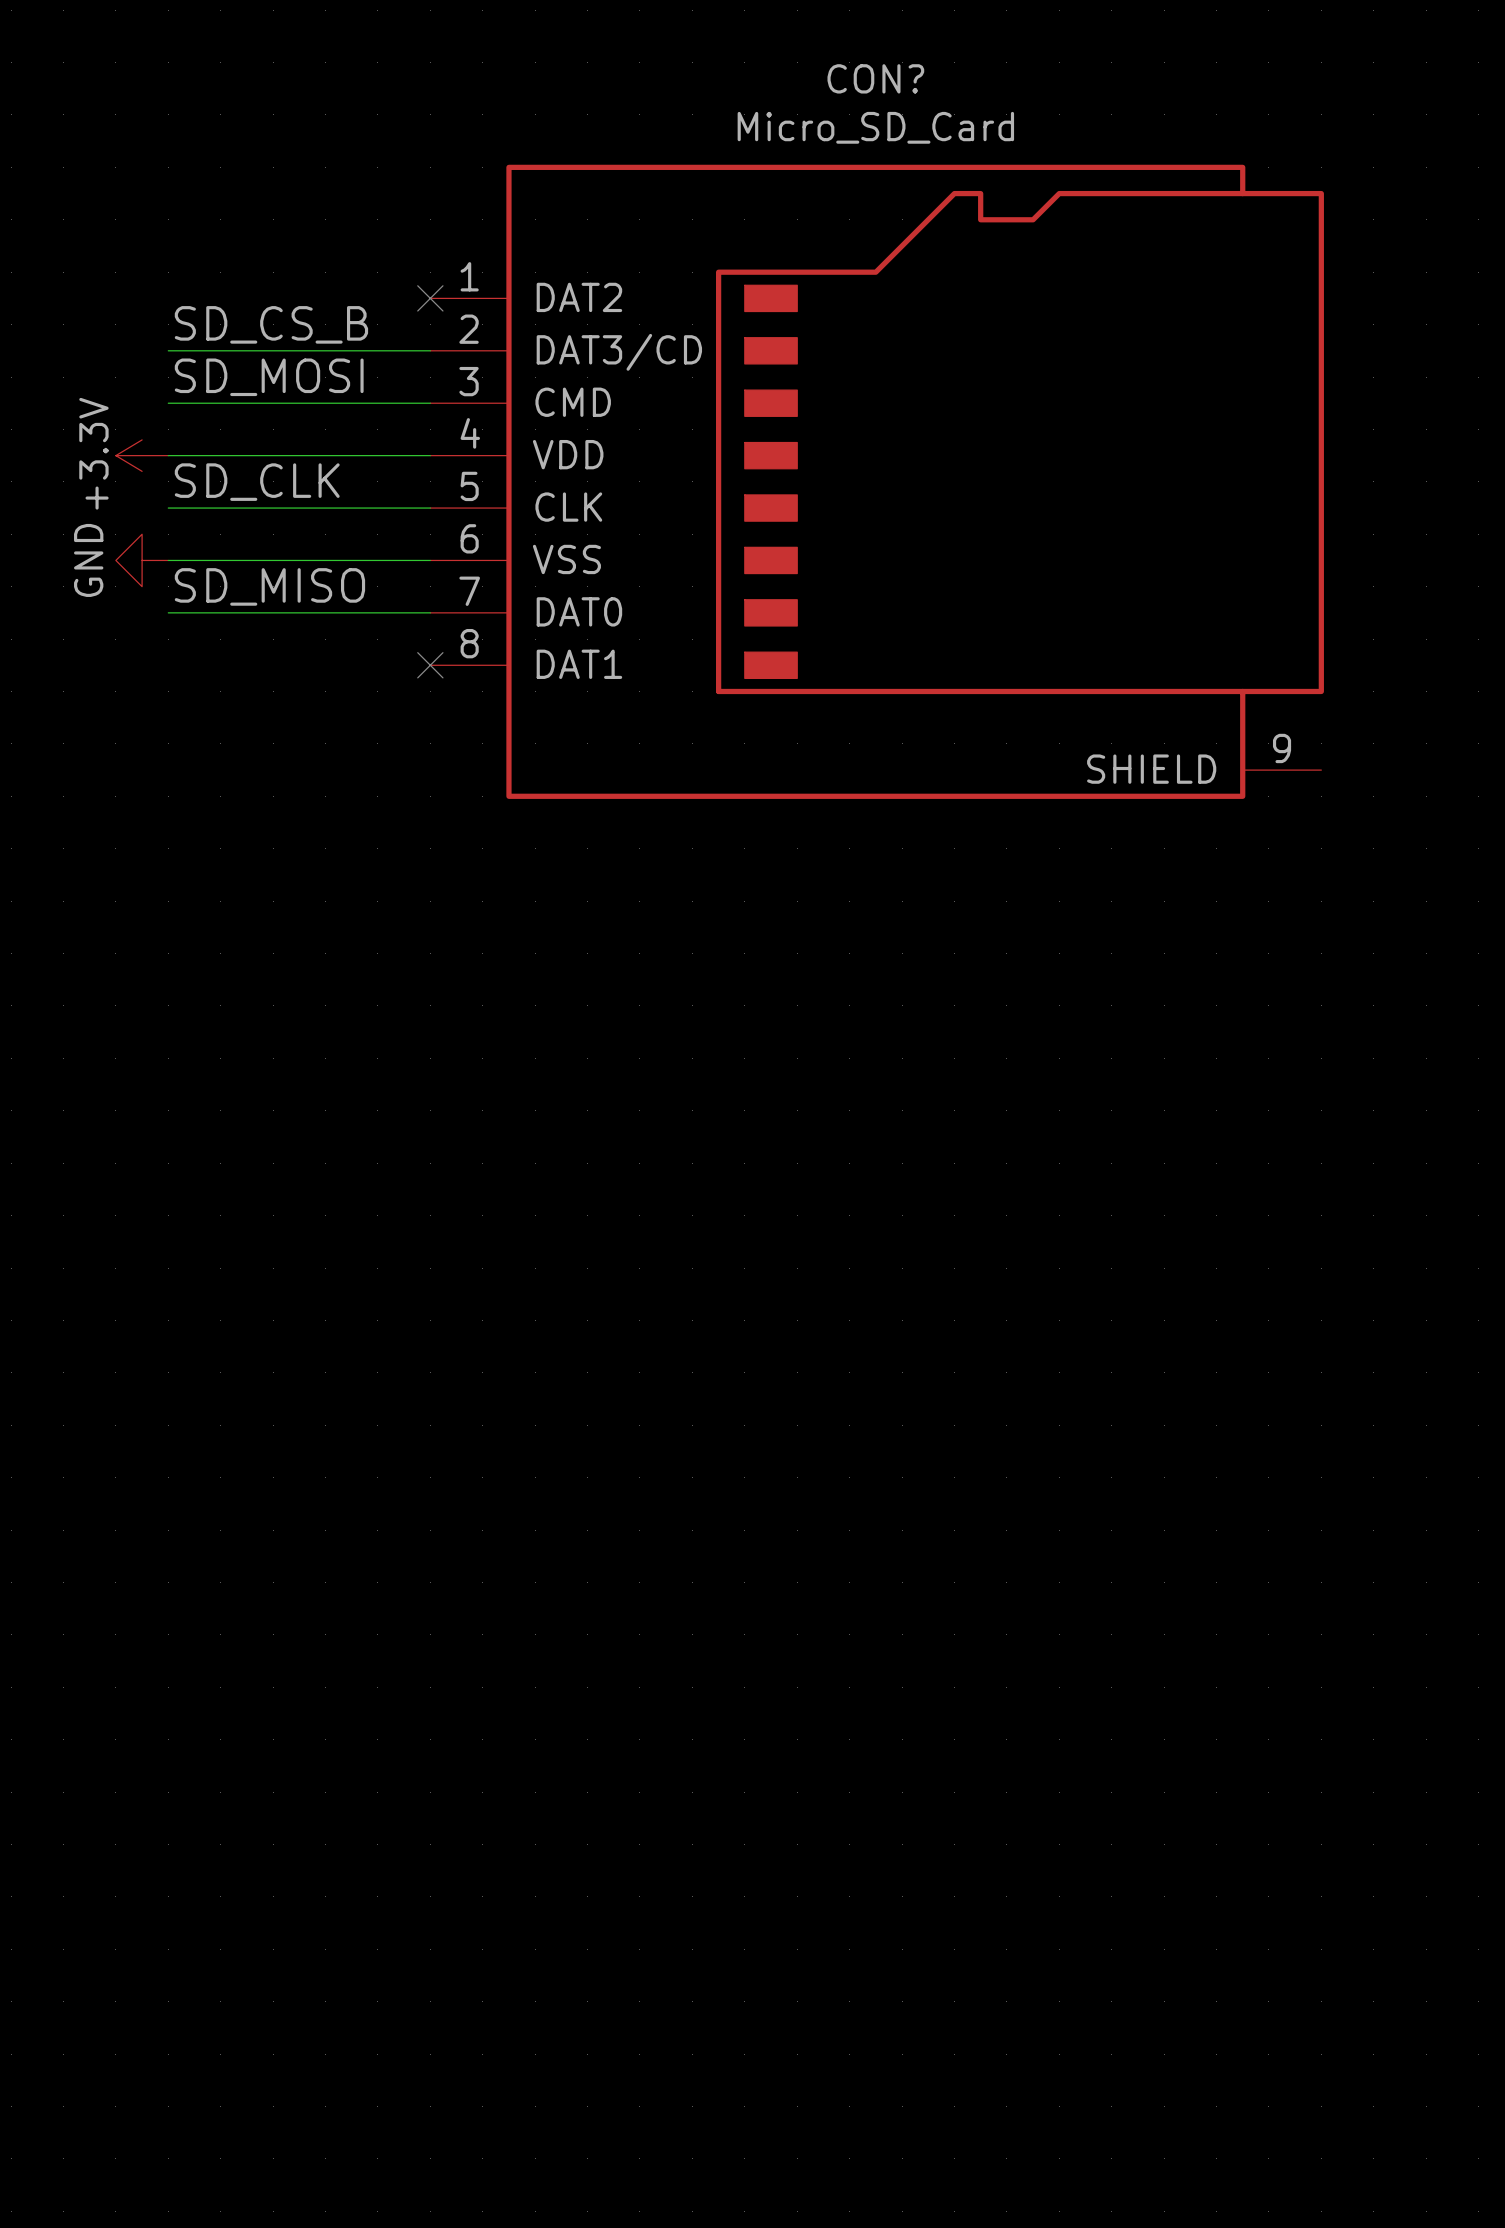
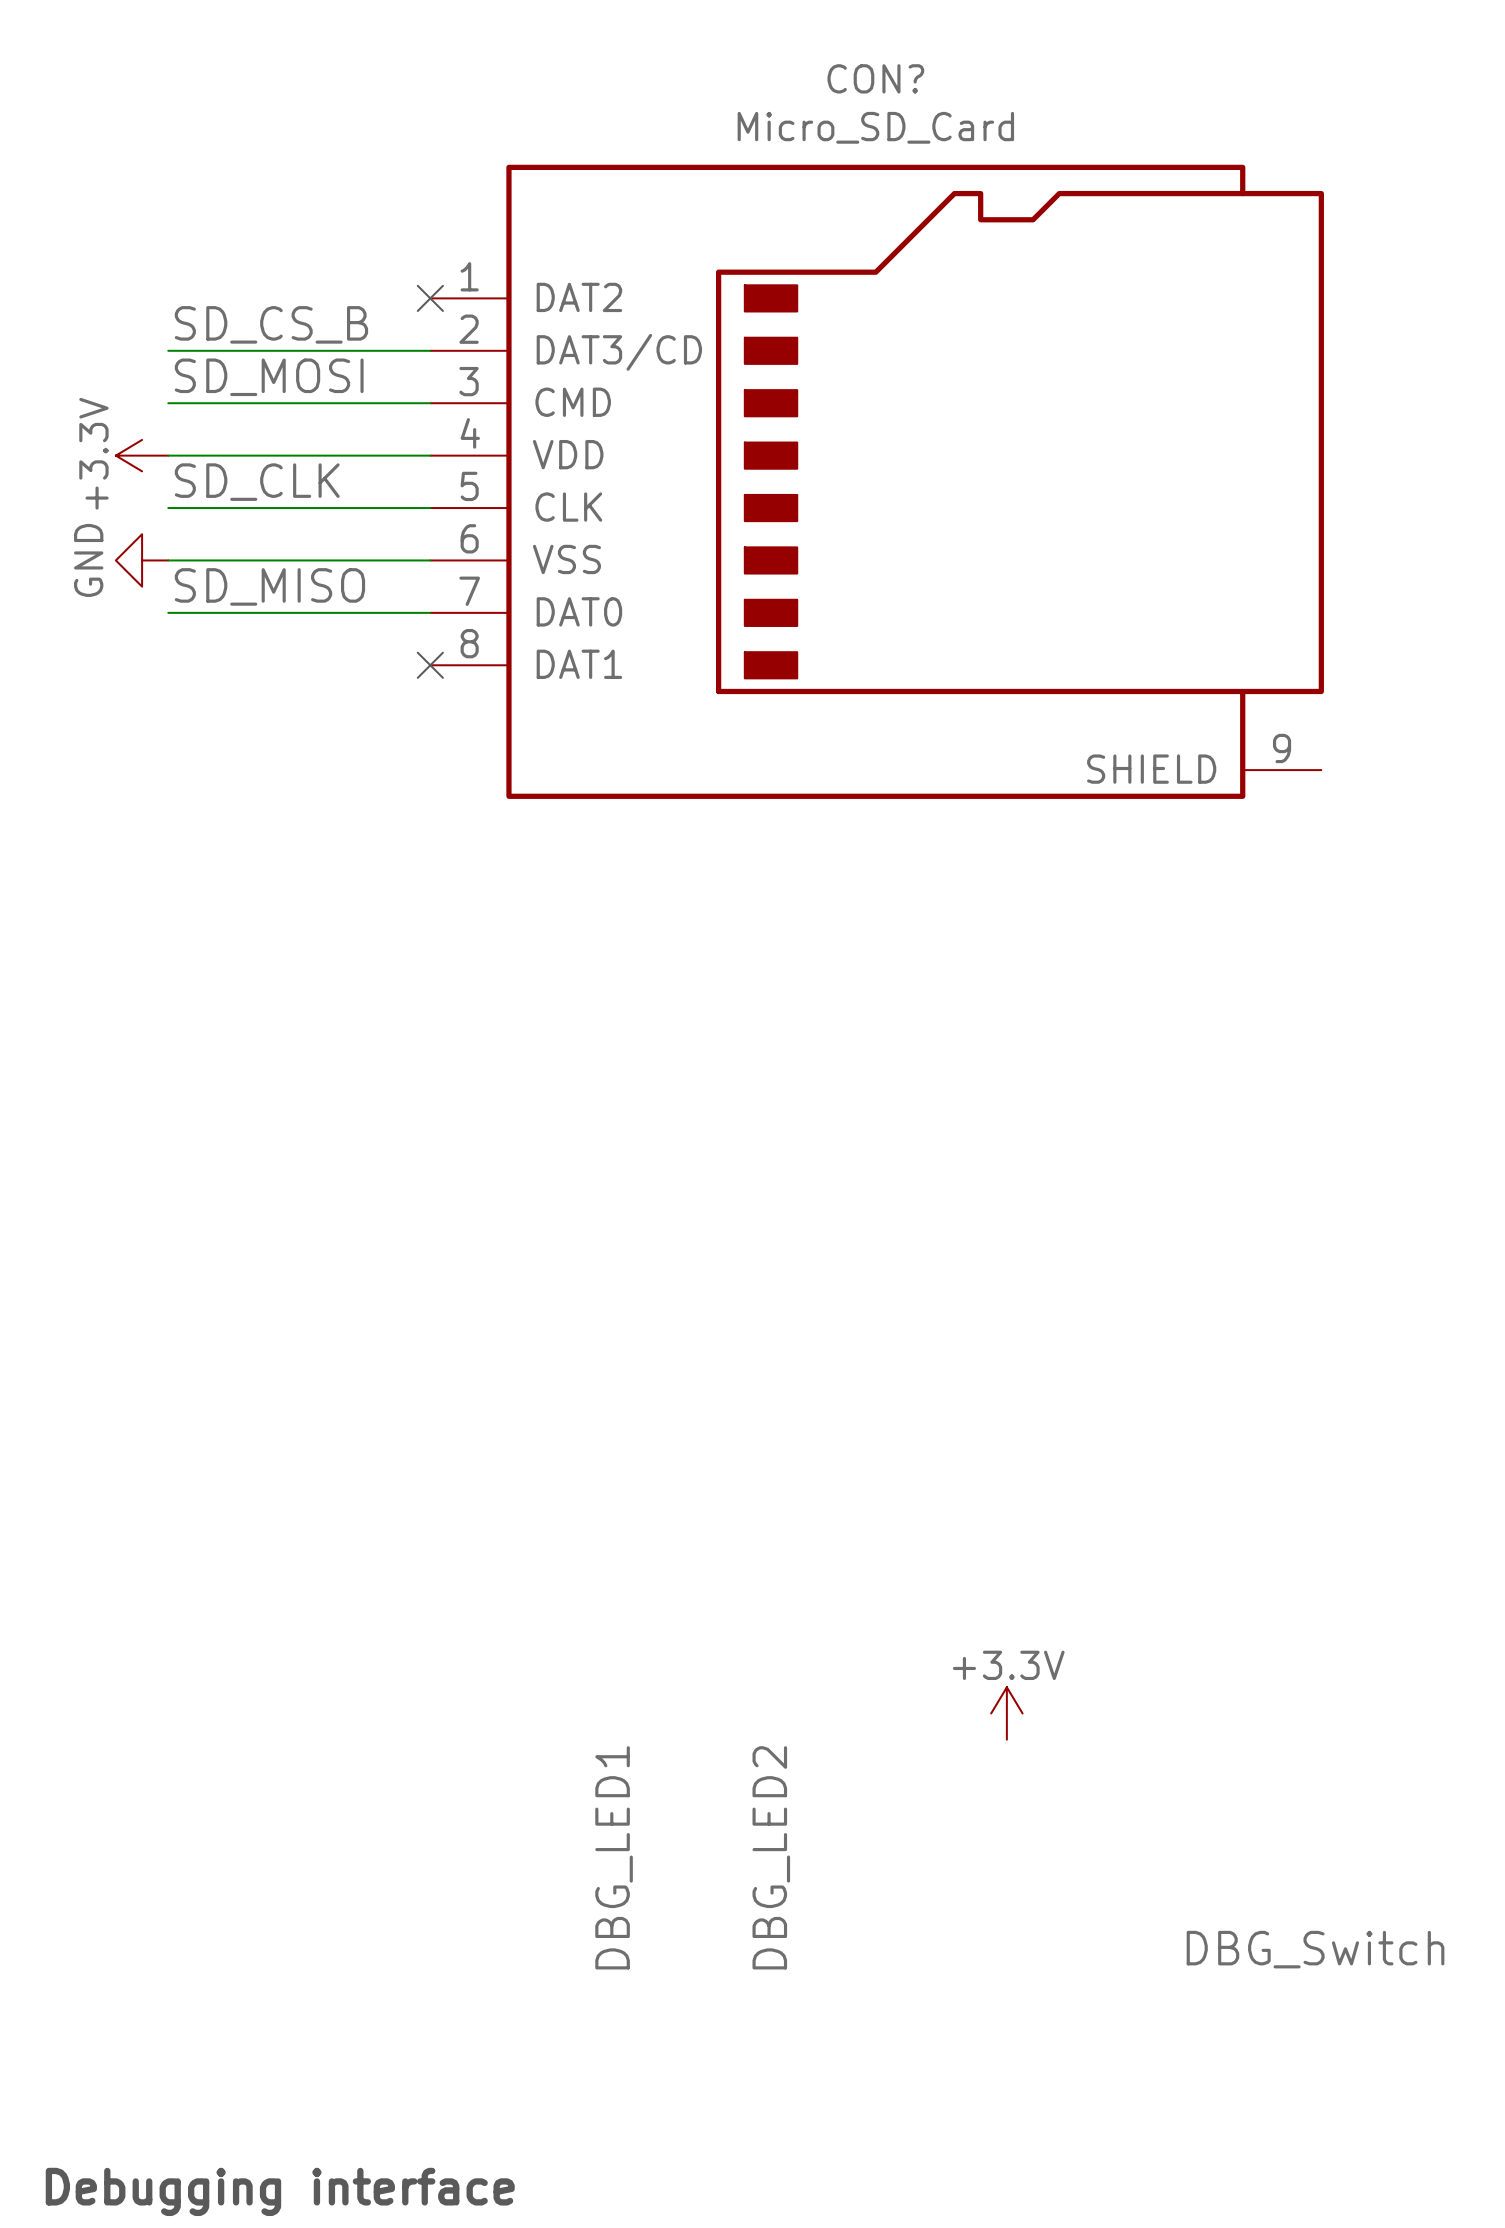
power symbol: none -> +3.3V (1006, 1713)
label: none -> DBG_LED1 (614, 1857)
label: none -> DBG_LED2 (771, 1857)
label: none -> DBG_Switch (1315, 1949)
text: none -> Debugging interface (280, 2191)

